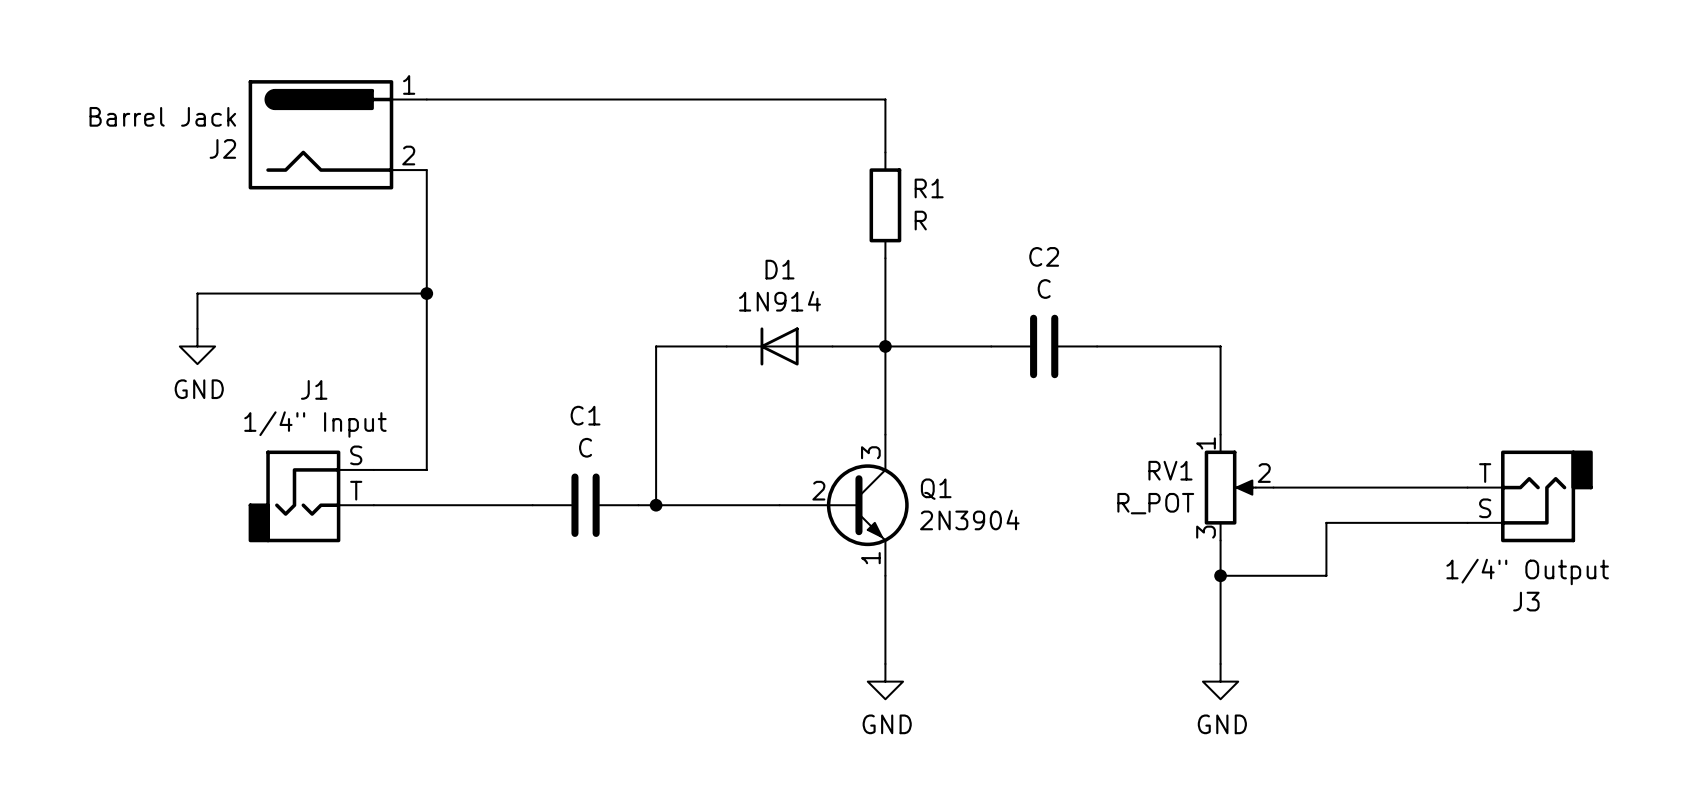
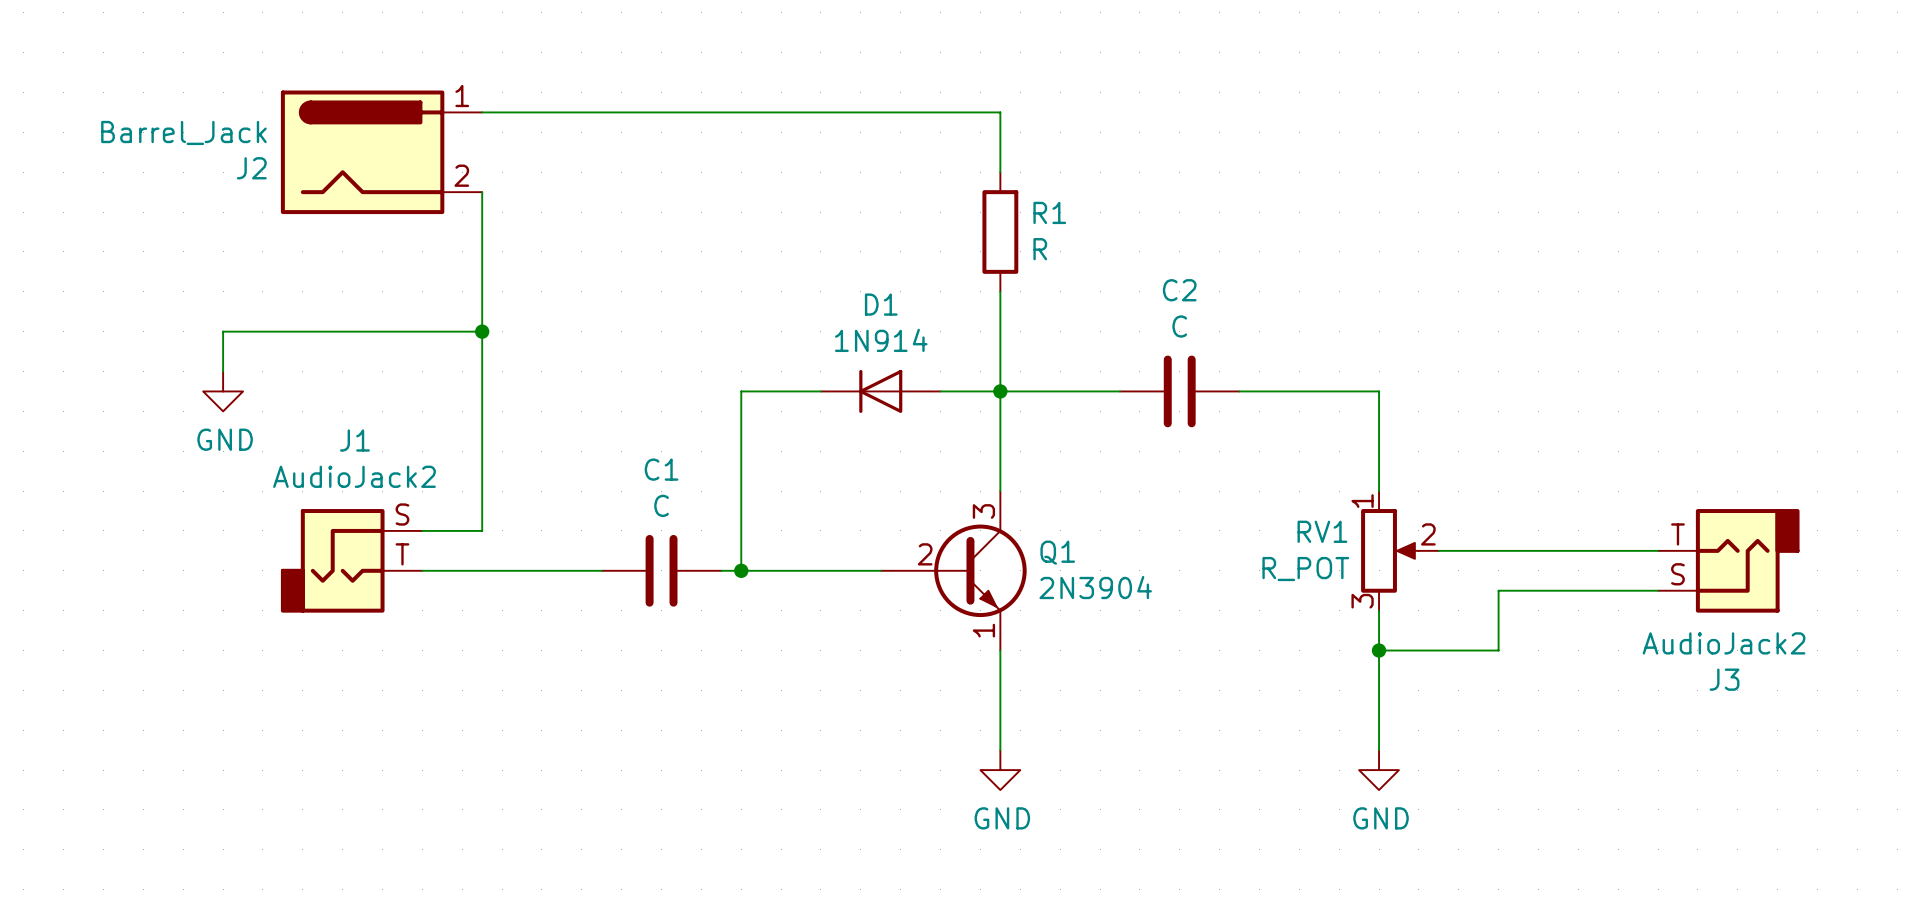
J2 value: Barrel Jack (162, 116) -> Barrel_Jack (183, 132)
J1 value: 1/4" Input (315, 424) -> AudioJack2 (354, 476)
J3 value: 1/4" Output (1527, 571) -> AudioJack2 (1724, 643)

